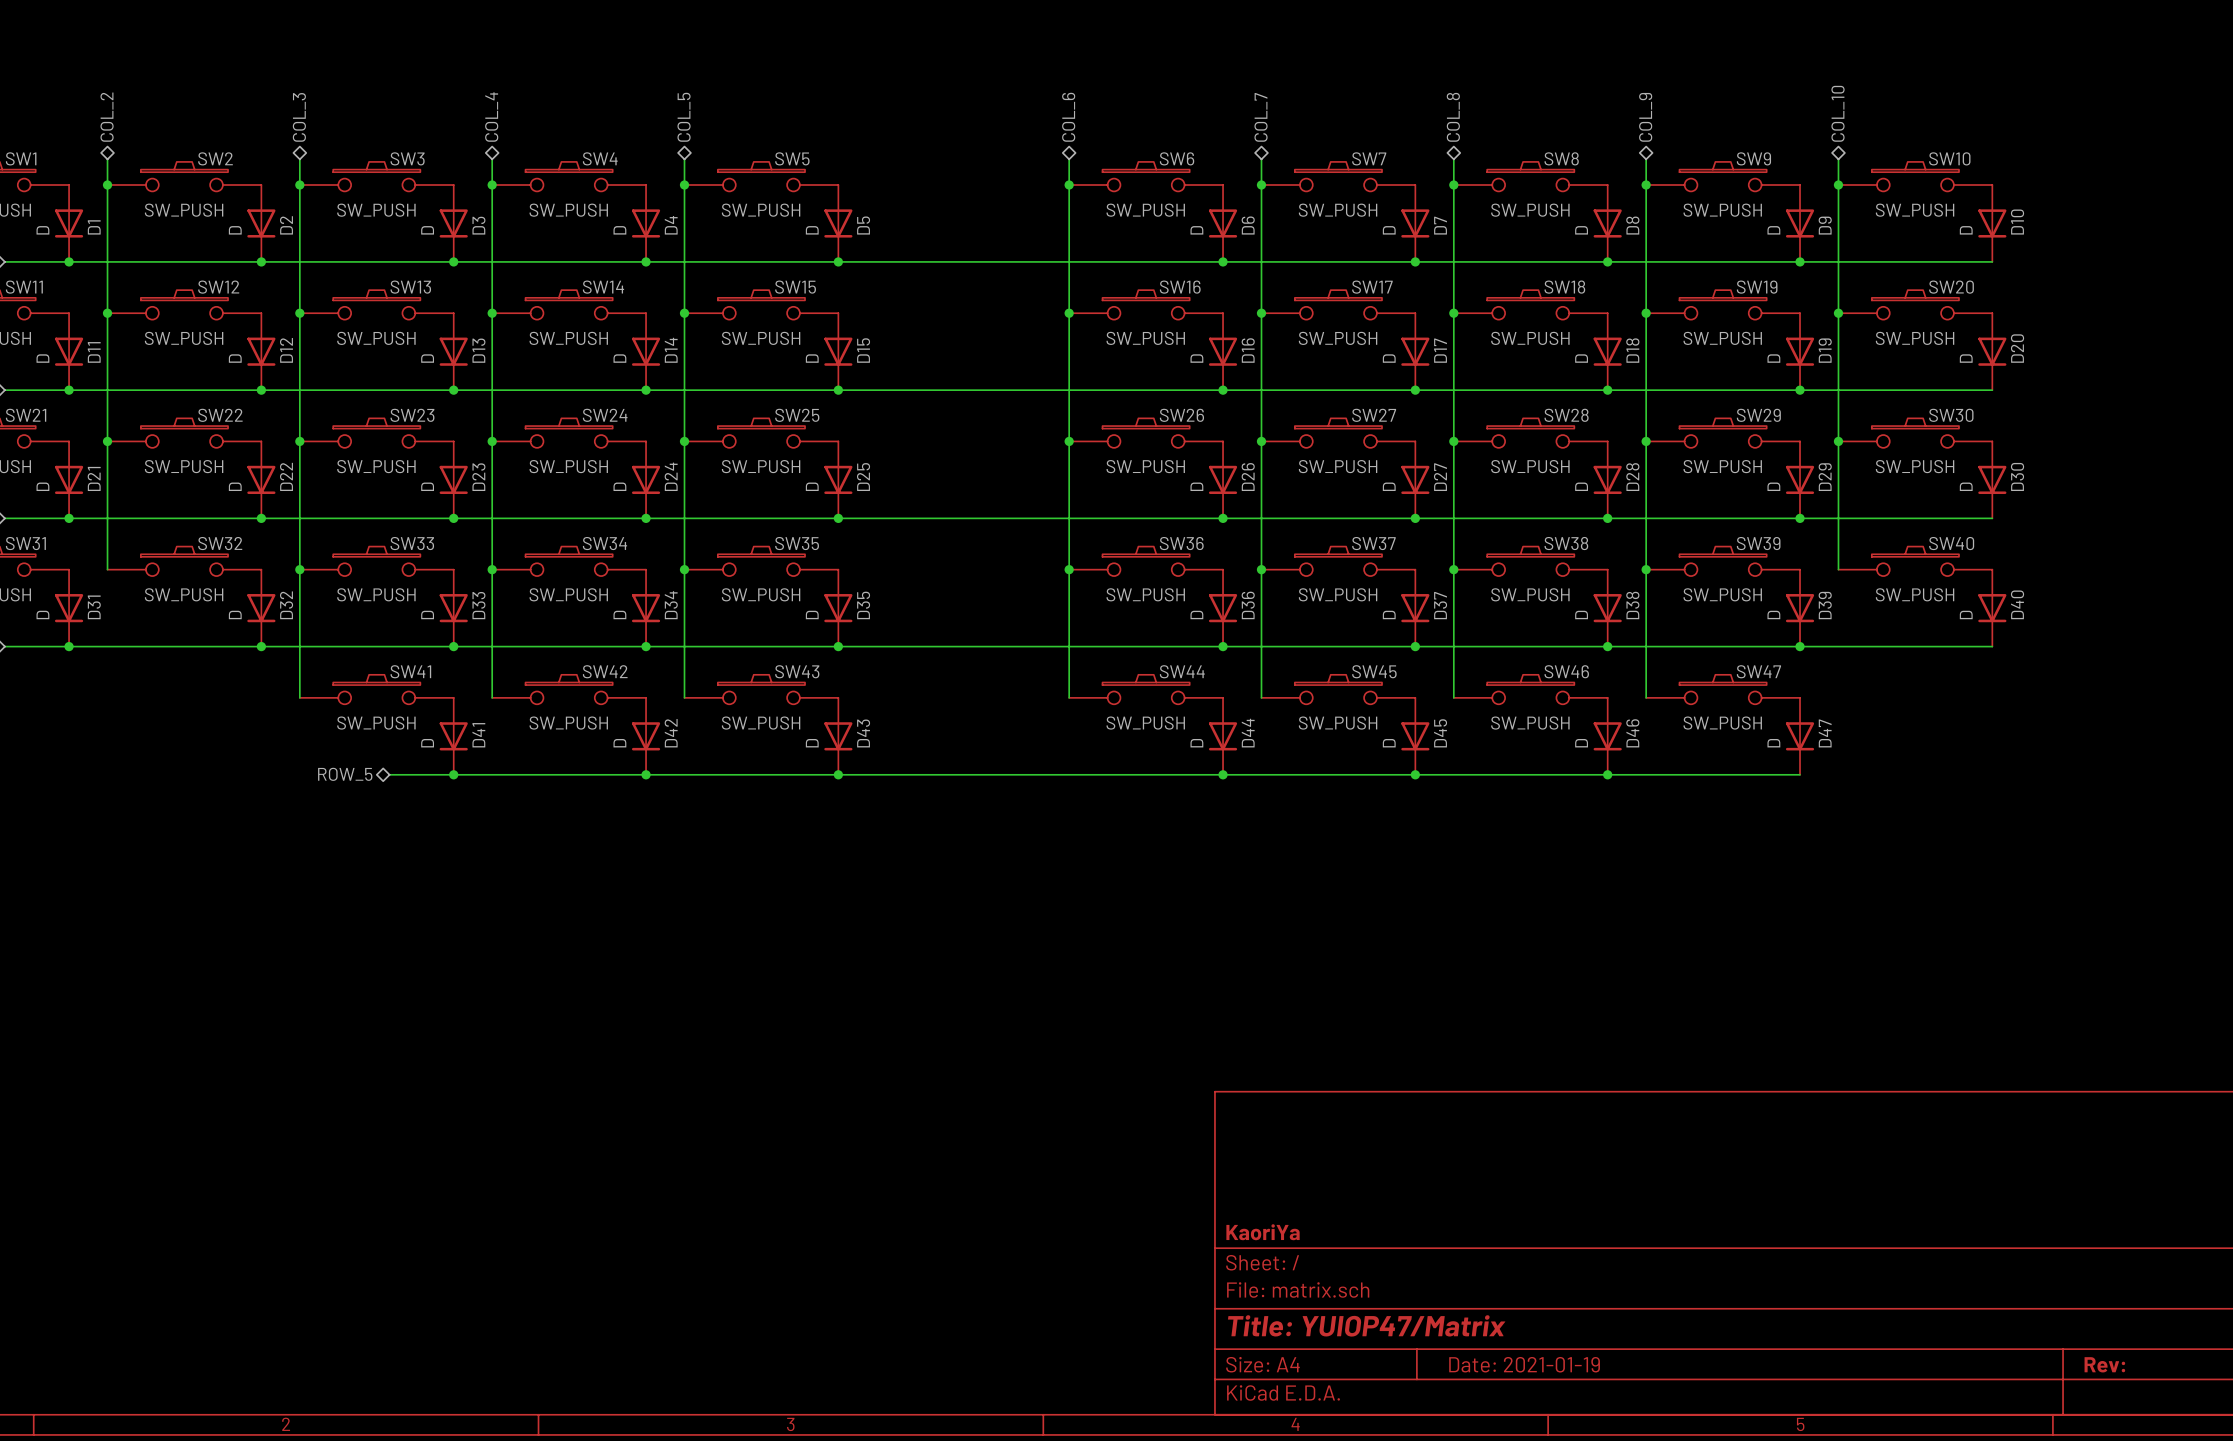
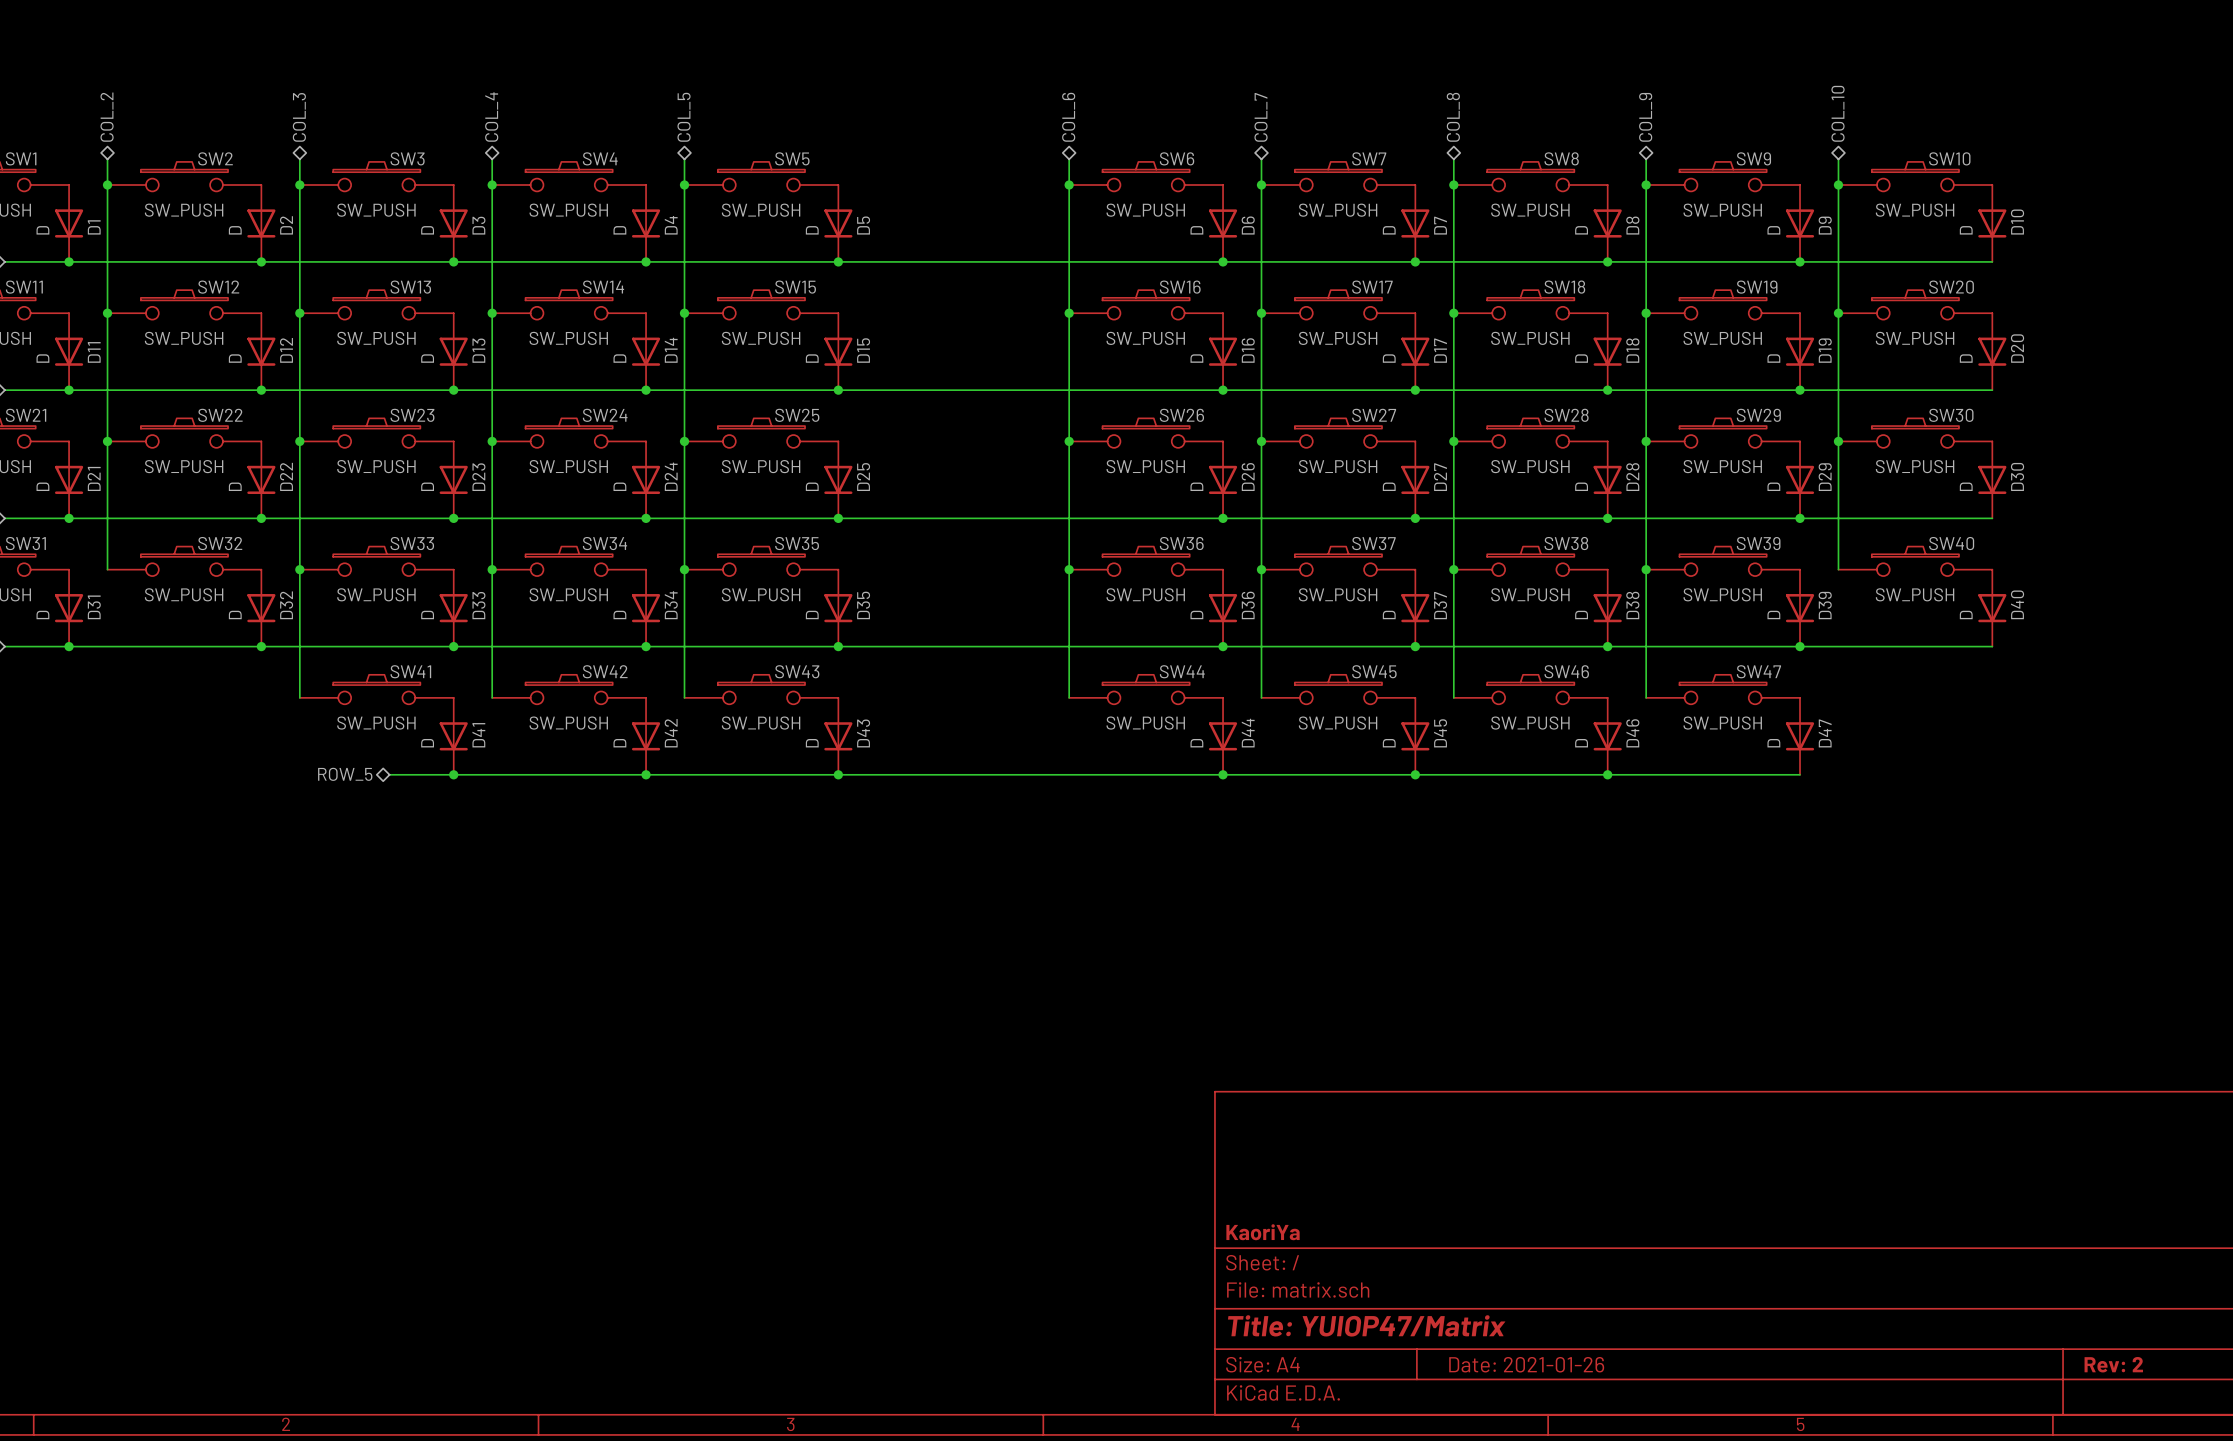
title block: Date: 2021-01-19 (1524, 1364) -> Date: 2021-01-26 (1526, 1364)
title block: Rev: (2104, 1364) -> Rev: 2 (2113, 1364)

